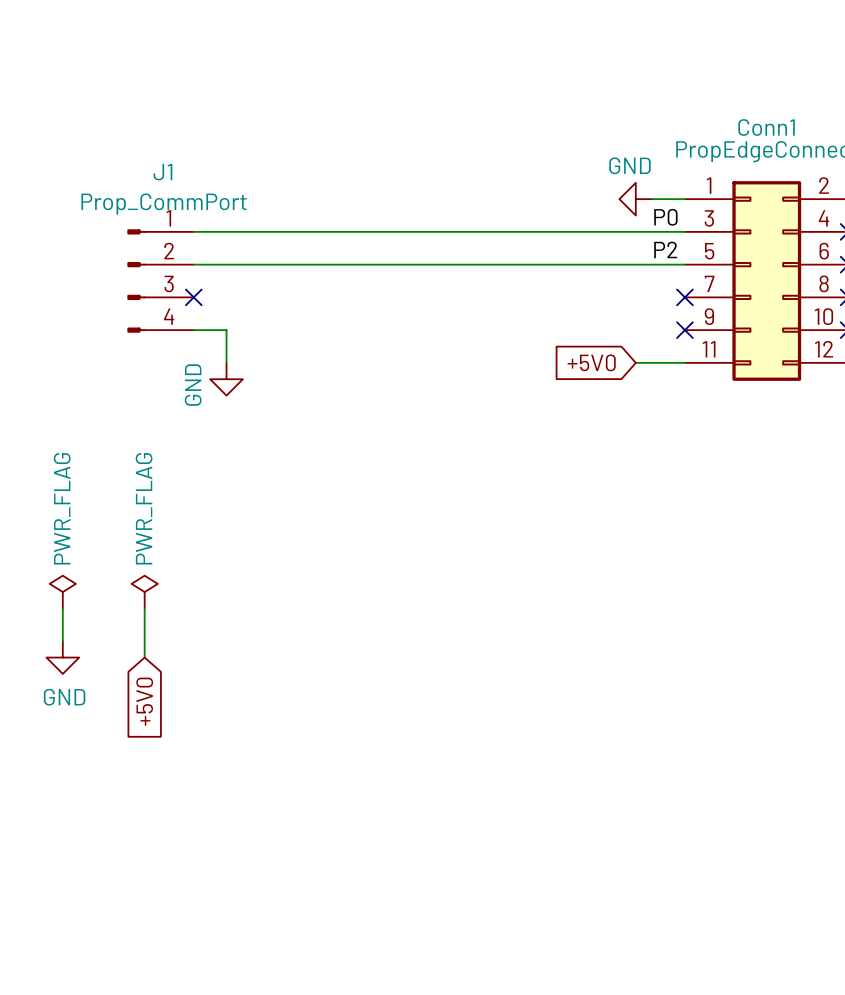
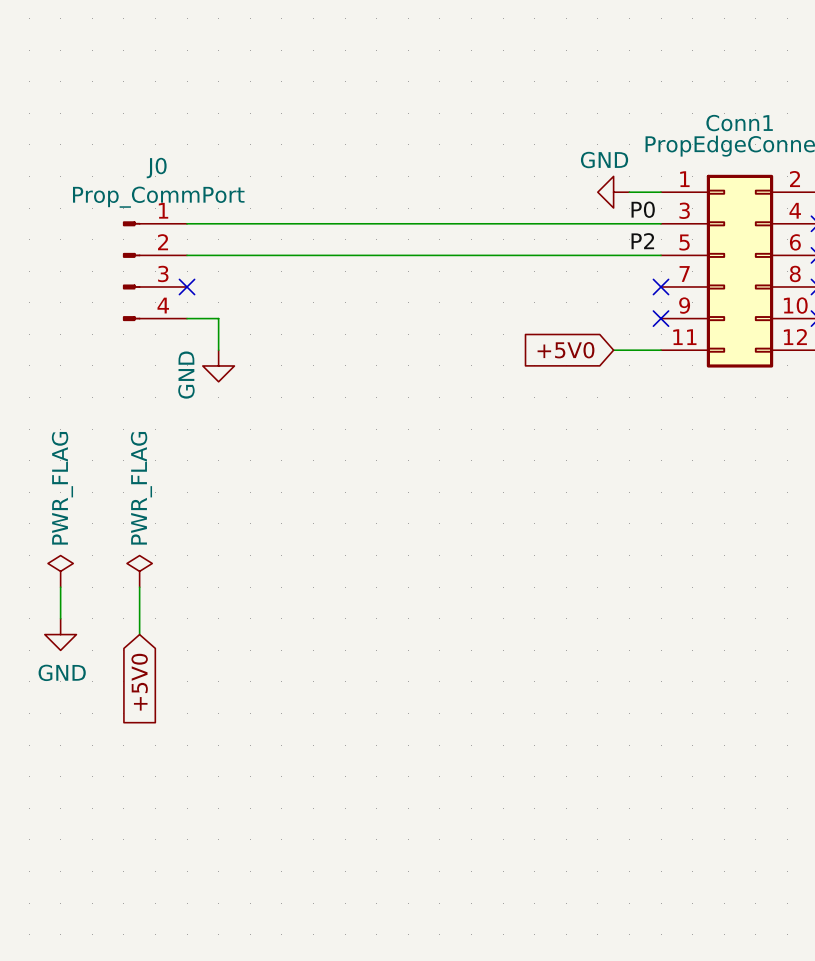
J1 name: J1 (162, 172) -> J0 (156, 168)

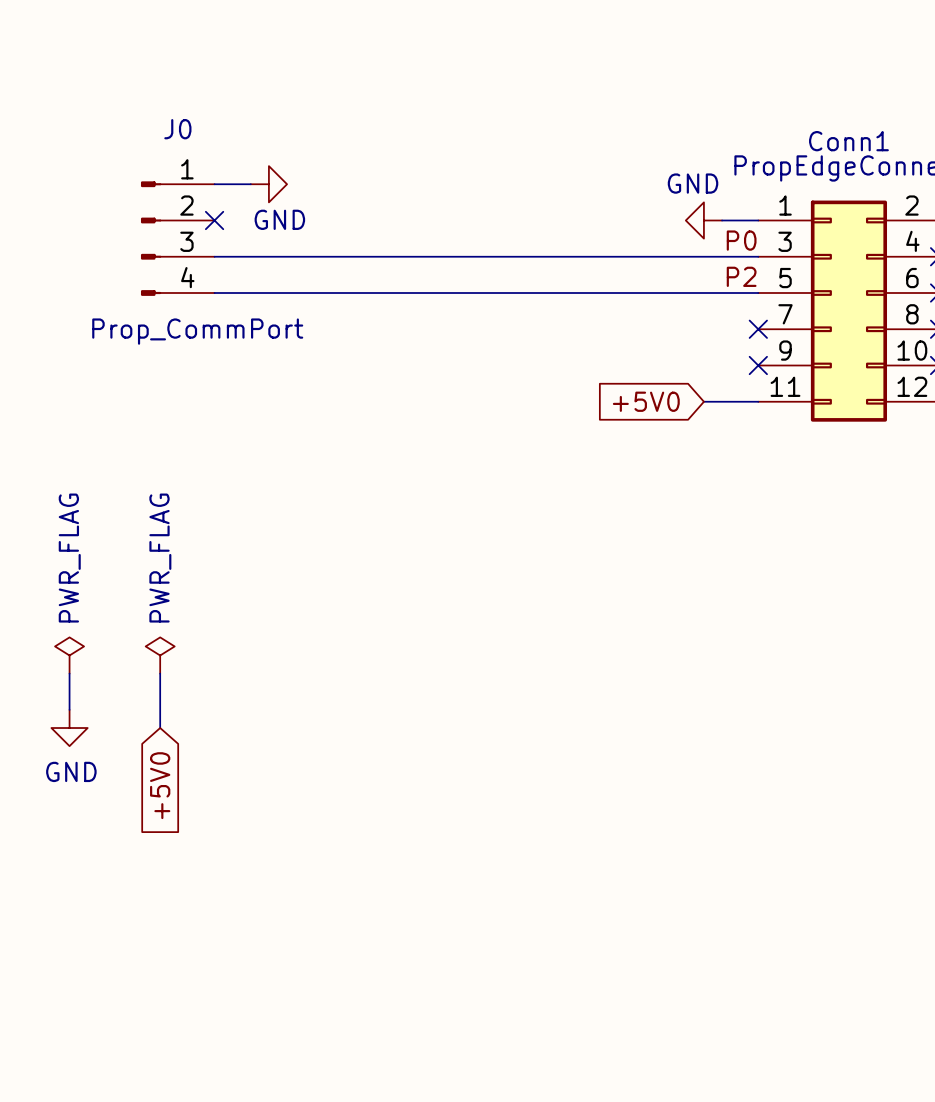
wire: none -> (214, 184) (250, 184)
J0 name position: J0 (156, 168) -> J0 (177, 129)
no-connect mark: none -> (214, 220)
J0 value position: Prop_CommPort (158, 197) -> Prop_CommPort (197, 331)
J0 position: (154, 271) -> (177, 238)
no-connect mark: (187, 286) -> none
wire: (187, 318) (218, 318) (218, 350) -> none
power symbol rotation: 0° (218, 365) -> 90° counterclockwise (268, 184)
power symbol position: GND (218, 365) -> GND (268, 184)

